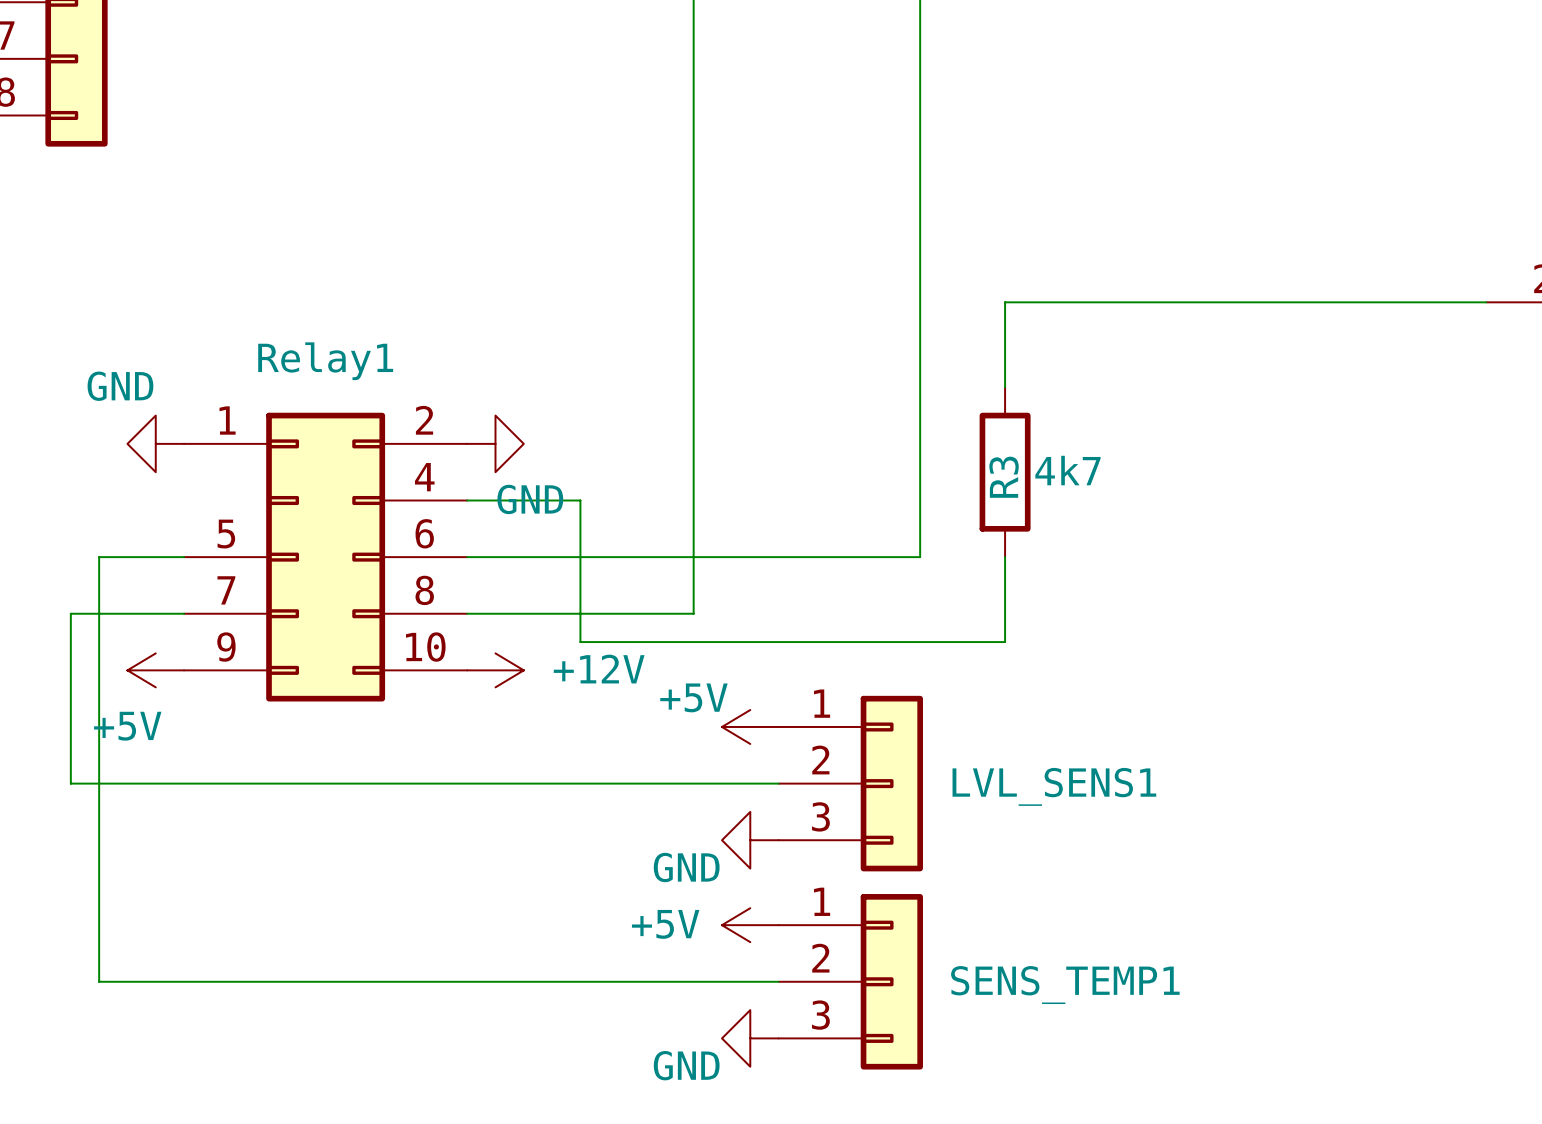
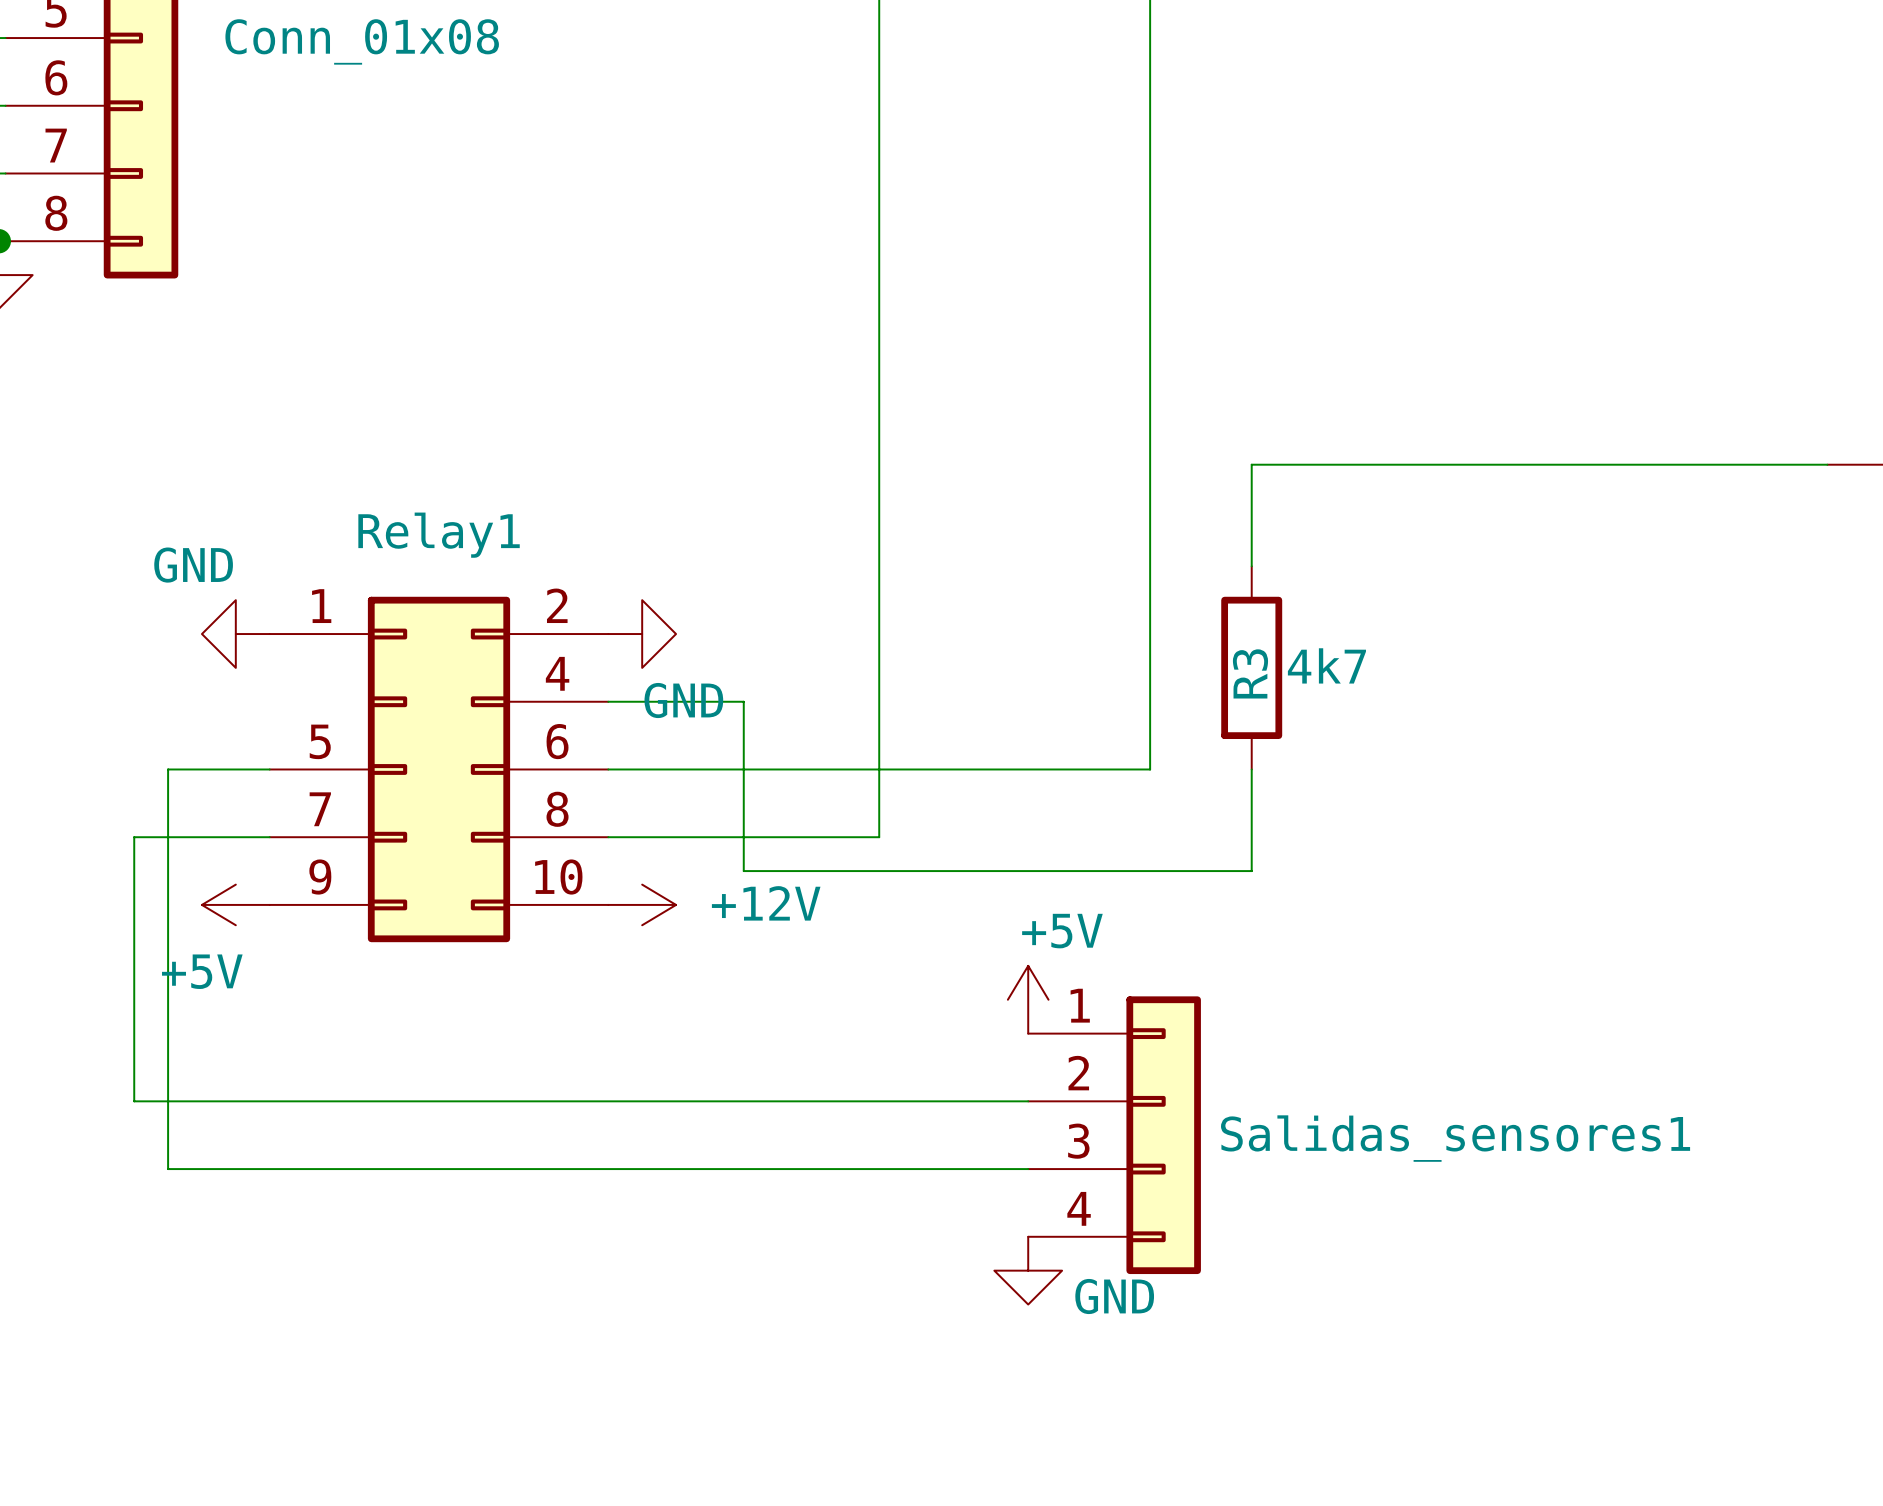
power symbol rotation: 0° (750, 726) -> 90° clockwise (1028, 999)
power symbol position: +5V (750, 726) -> +5V (1028, 999)
wire: (70, 783) (778, 783) -> (134, 1040) (134, 1101) (1028, 1101)
LVL_SENS1: (850, 783) -> none
power symbol: GND (750, 840) -> none
Salidas_sensores1: none -> (1114, 1135)
wire: (99, 891) (99, 981) (778, 981) -> (168, 1169) (1028, 1169)
power symbol: +5V (750, 925) -> none
power symbol: none -> GND (1028, 1270)
SENS_TEMP1: (850, 981) -> none
power symbol: GND (750, 1038) -> none

